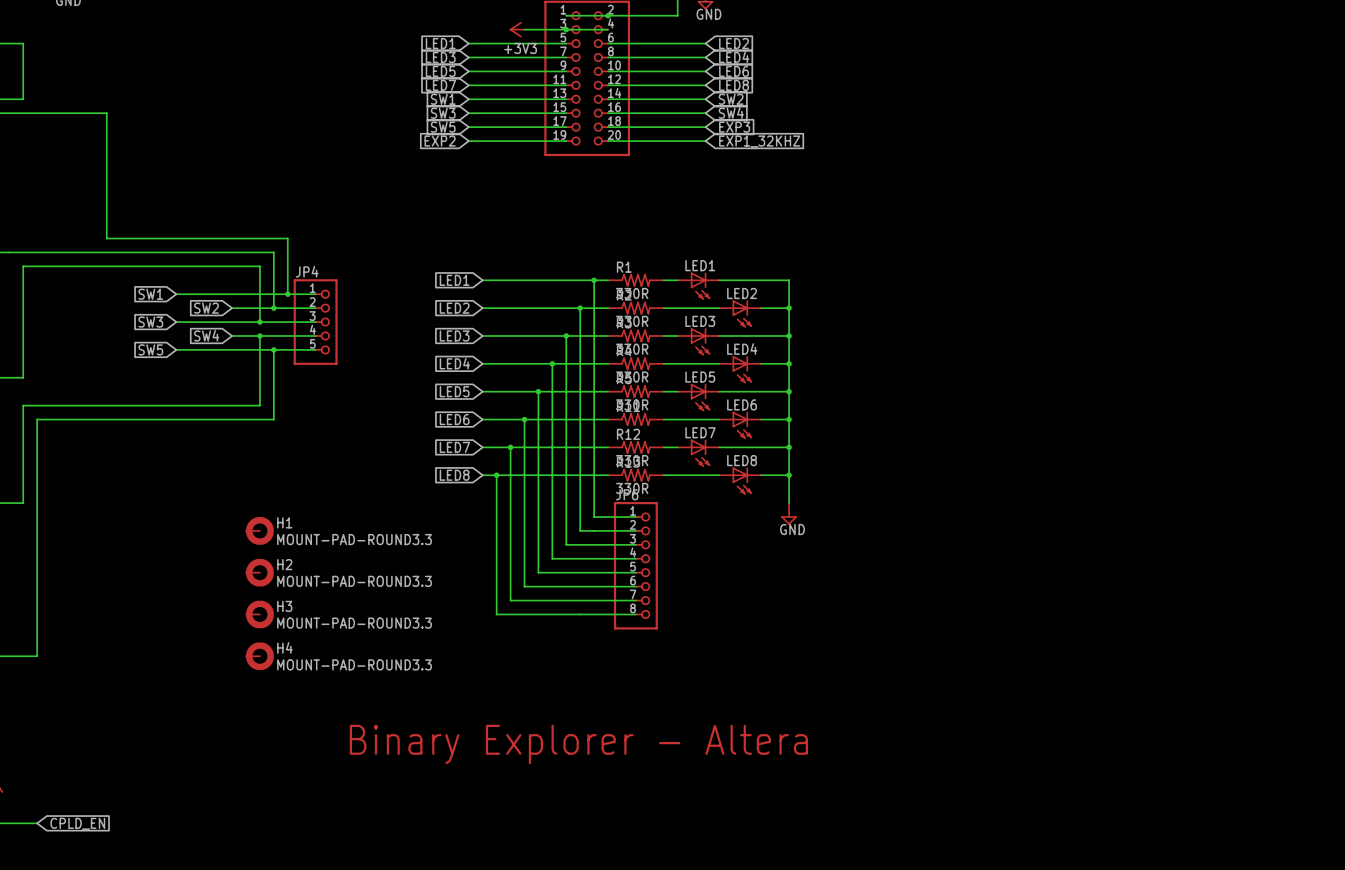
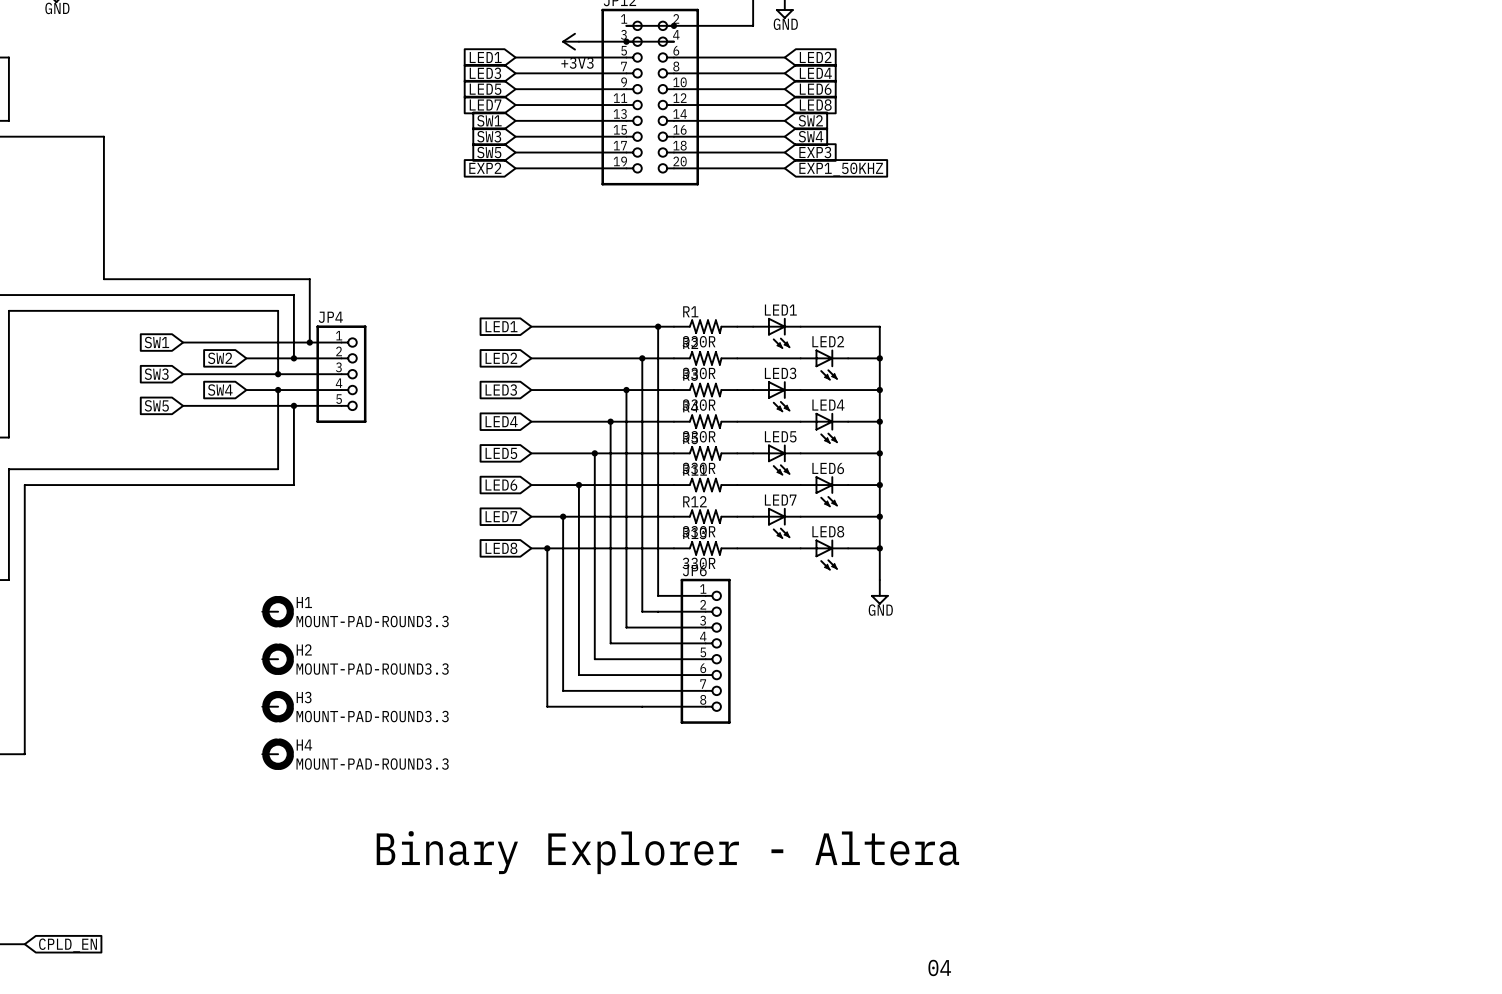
global label: EXP1_32KHZ (759, 141) -> EXP1_50KHZ (841, 169)
text: none -> 04 (939, 967)

